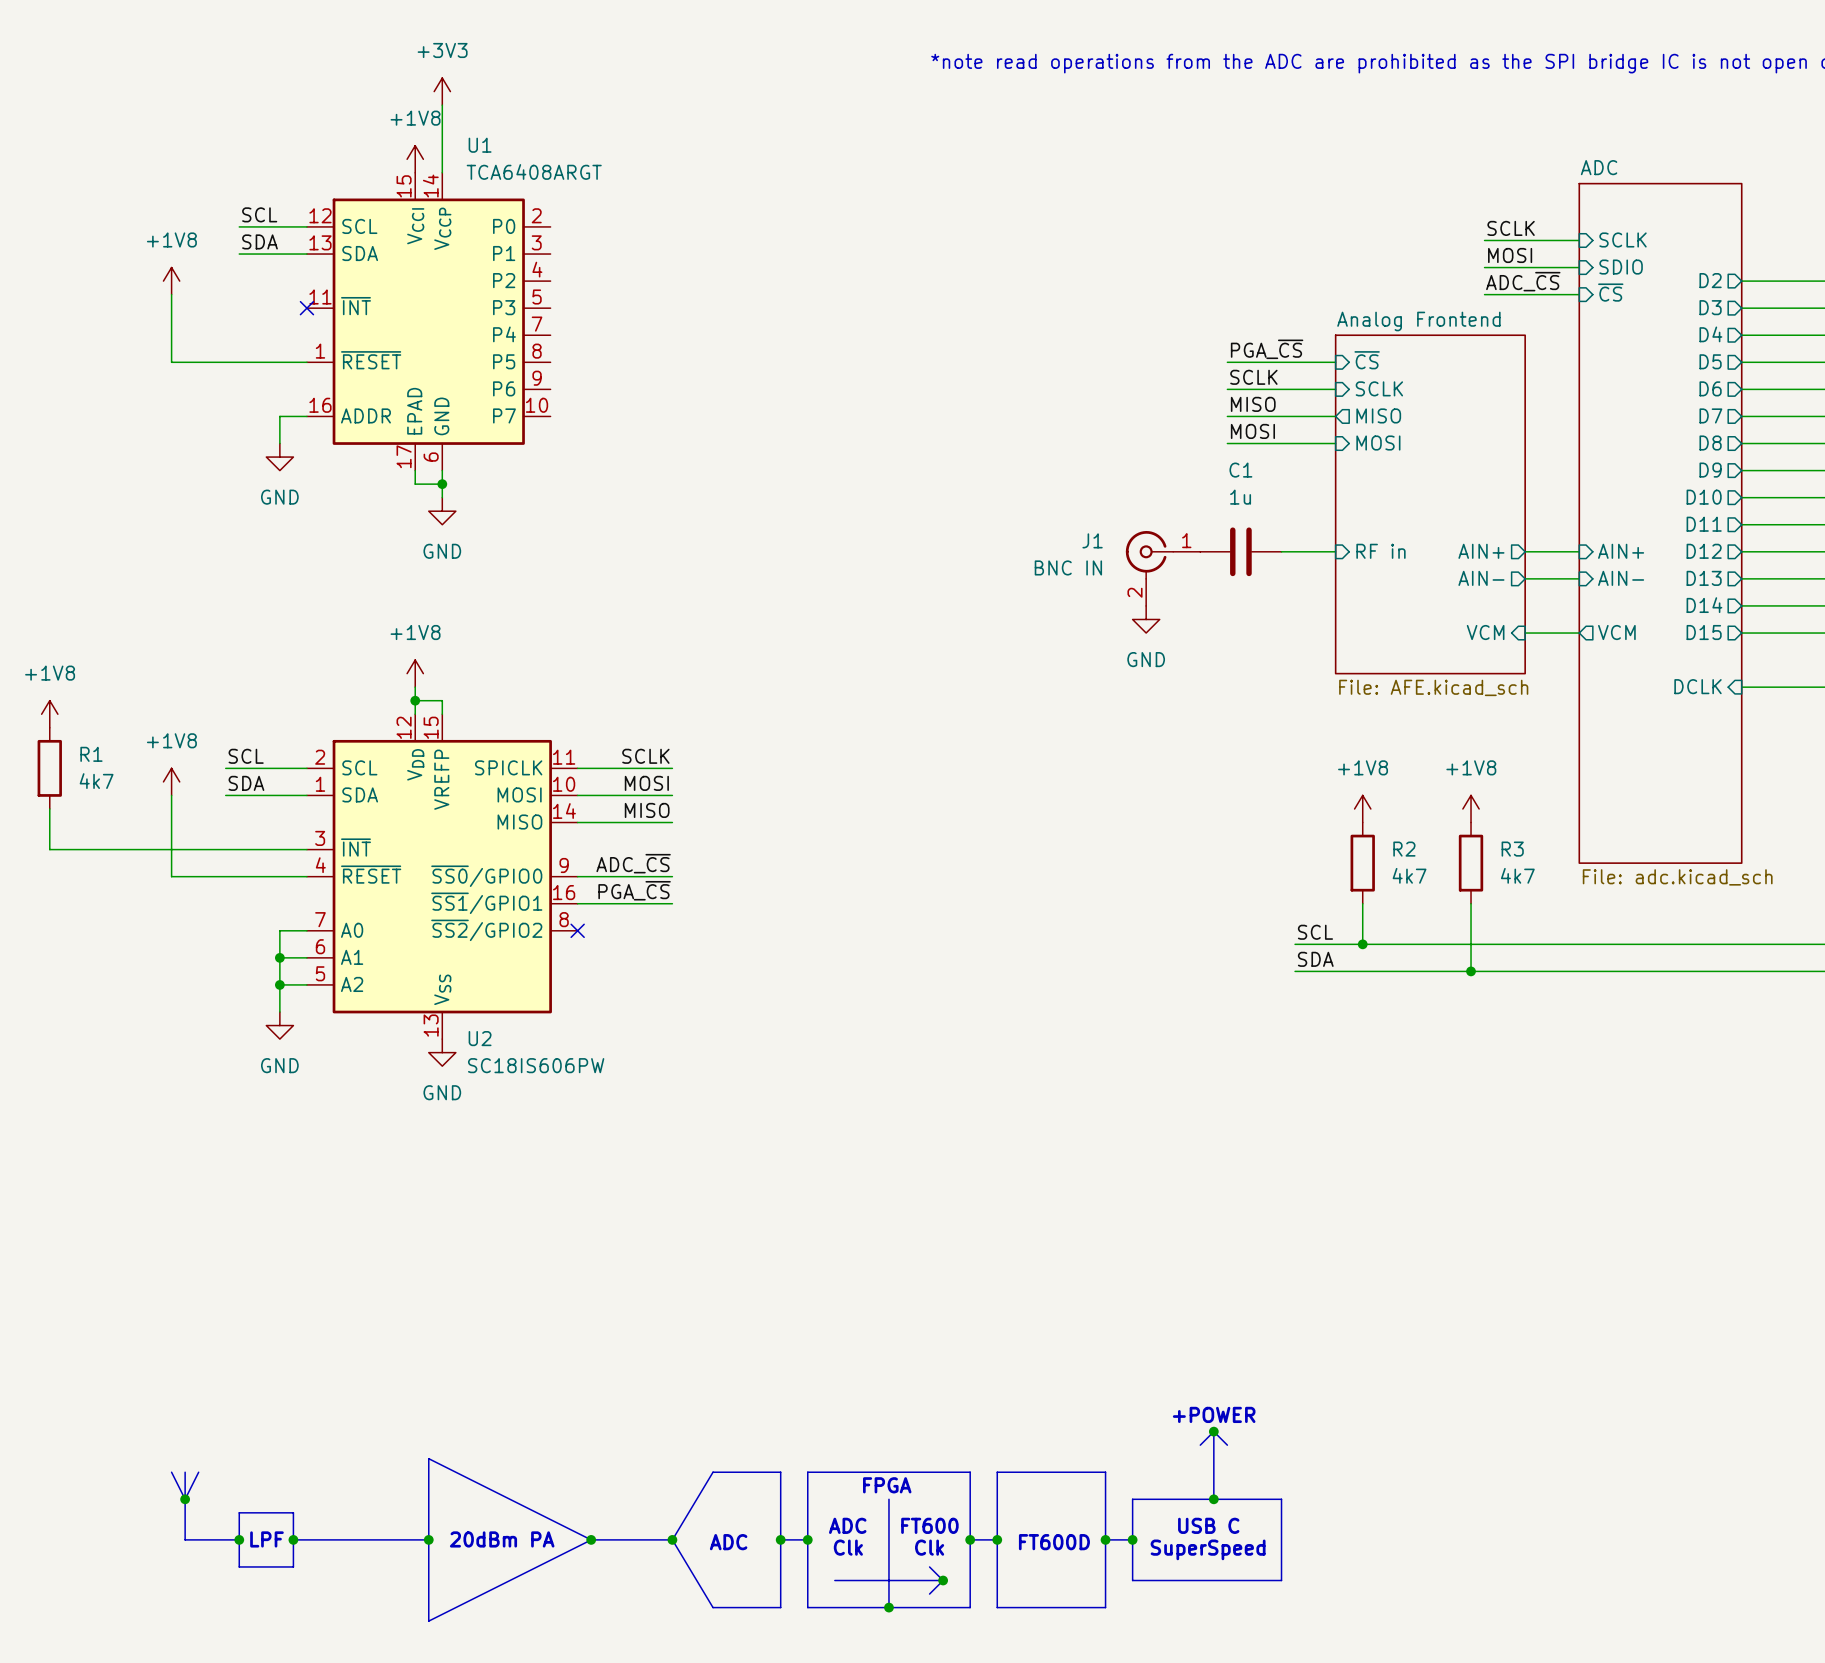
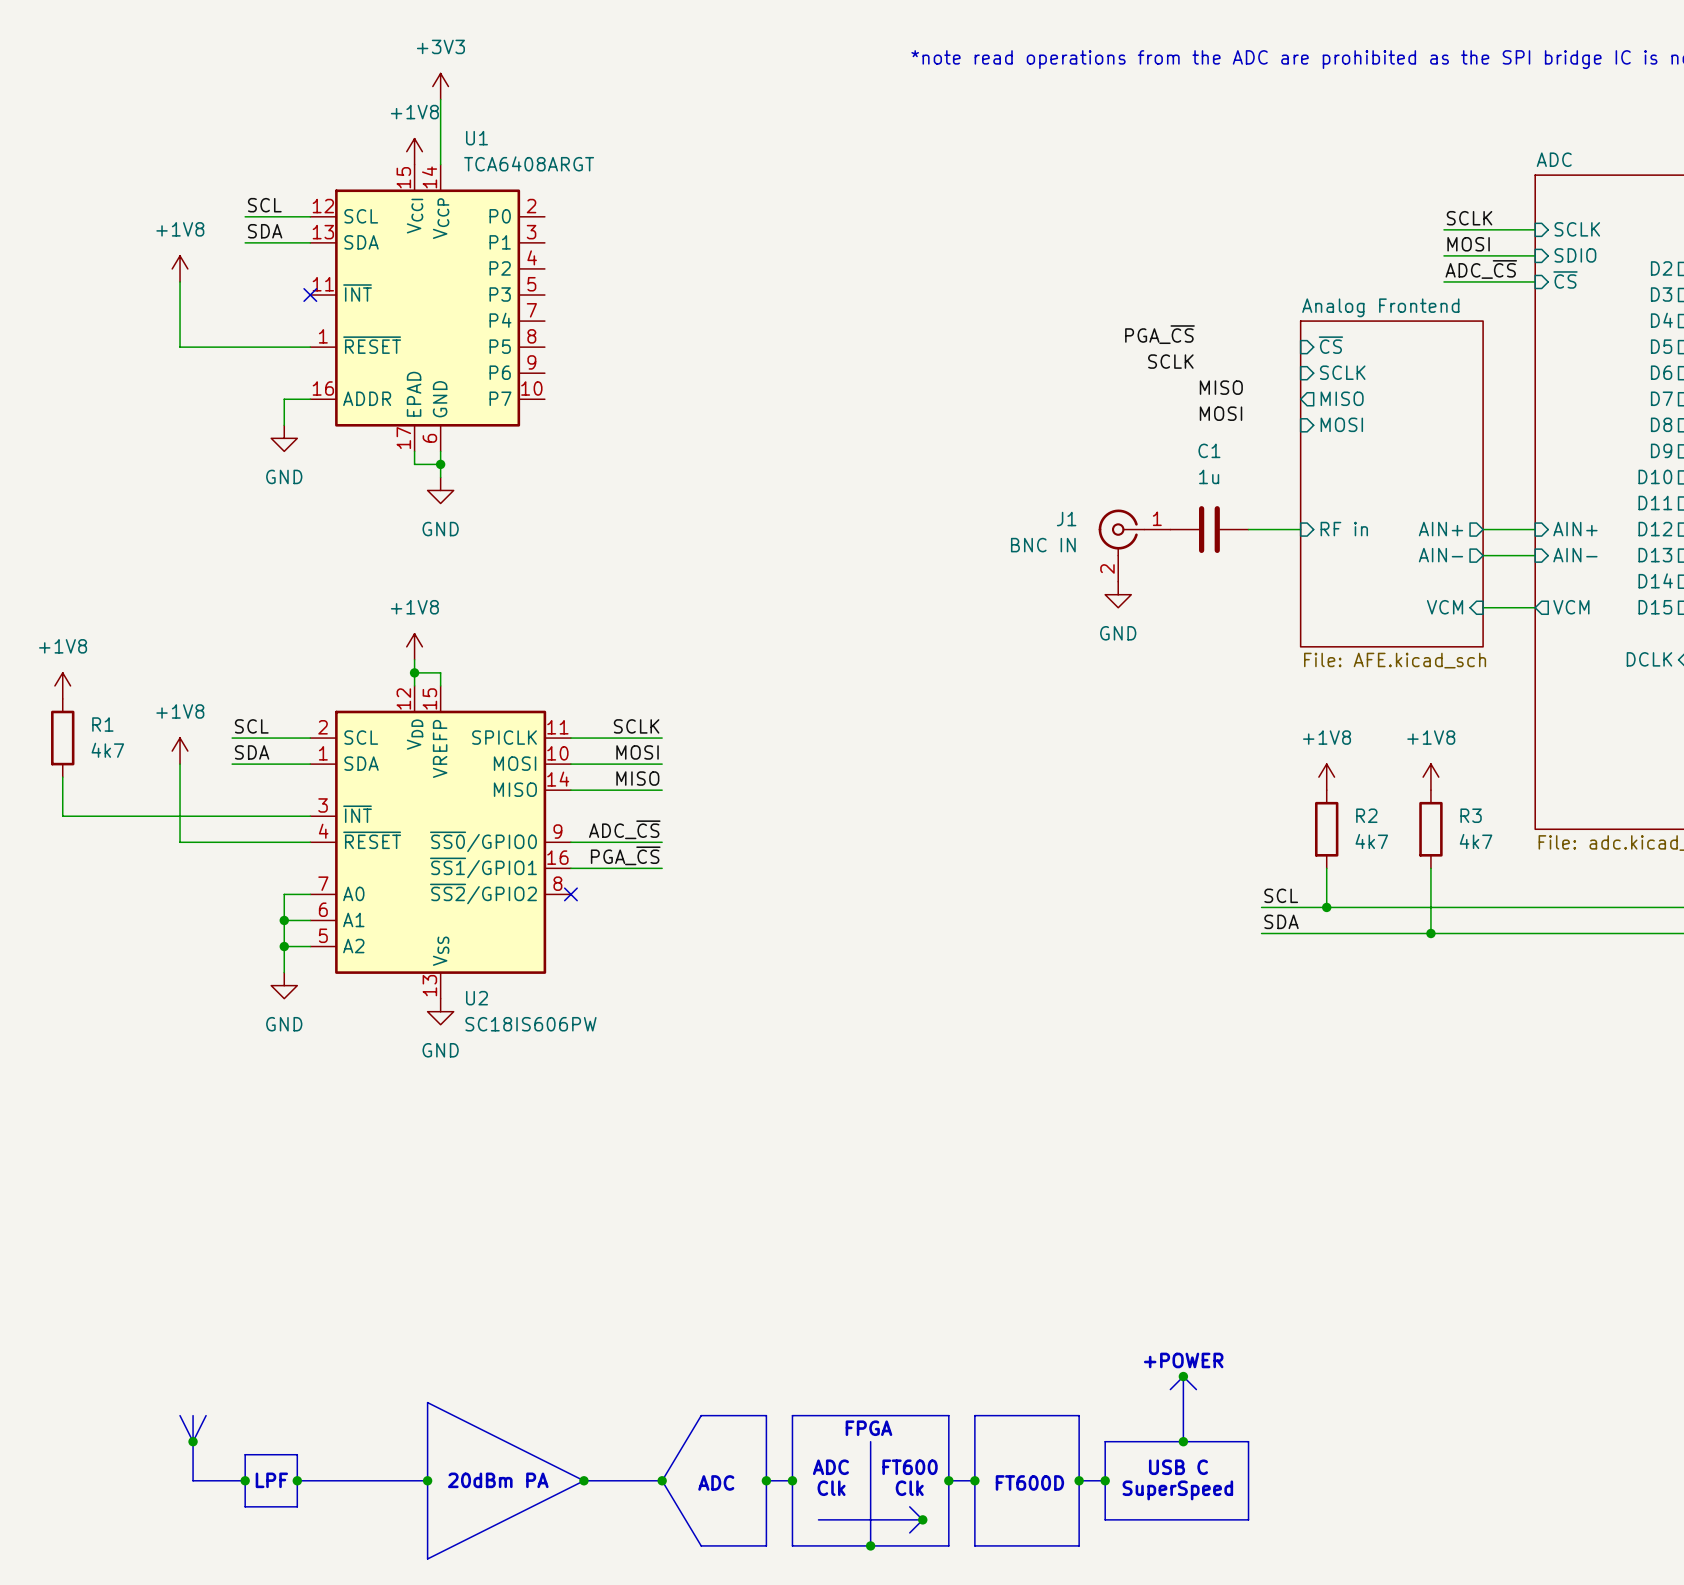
label position: PGA_~{CS} (1267, 349) -> PGA_~{CS} (1159, 334)
wire: (1227, 362) (1335, 362) -> none
label position: SCLK (1253, 377) -> SCLK (1170, 361)
wire: (1227, 389) (1335, 389) -> none
wire: (1227, 416) (1335, 416) -> none
wire: (1227, 443) (1335, 443) -> none

